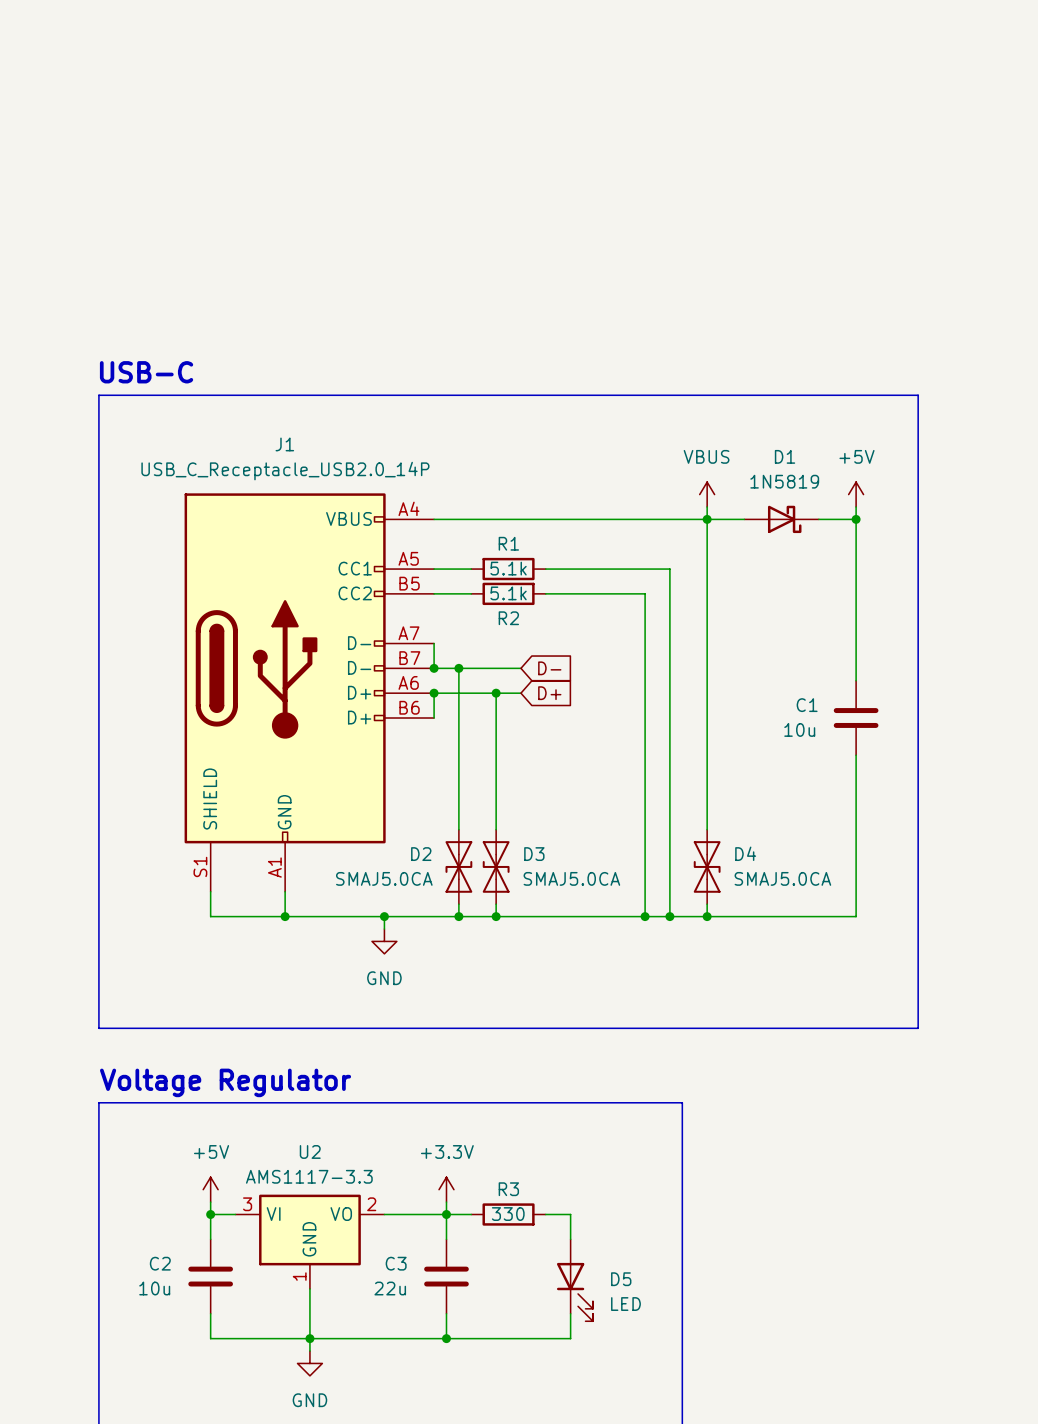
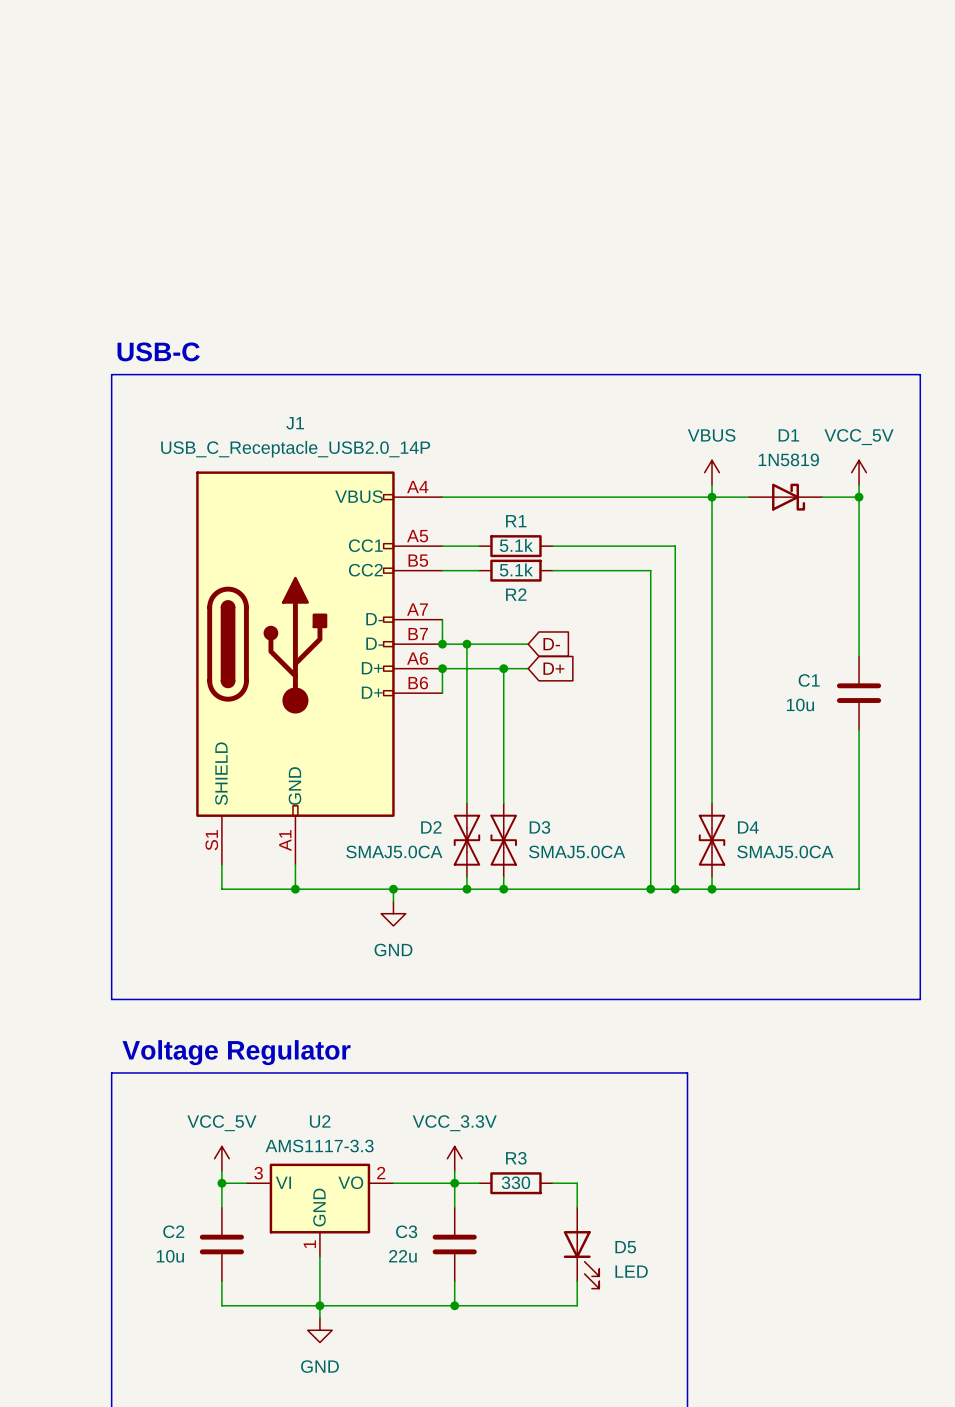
power symbol: +5V (856, 494) -> VCC_5V (859, 472)
power symbol: +5V (210, 1189) -> VCC_5V (221, 1158)
power symbol: +3.3V (446, 1189) -> VCC_3.3V (454, 1158)

